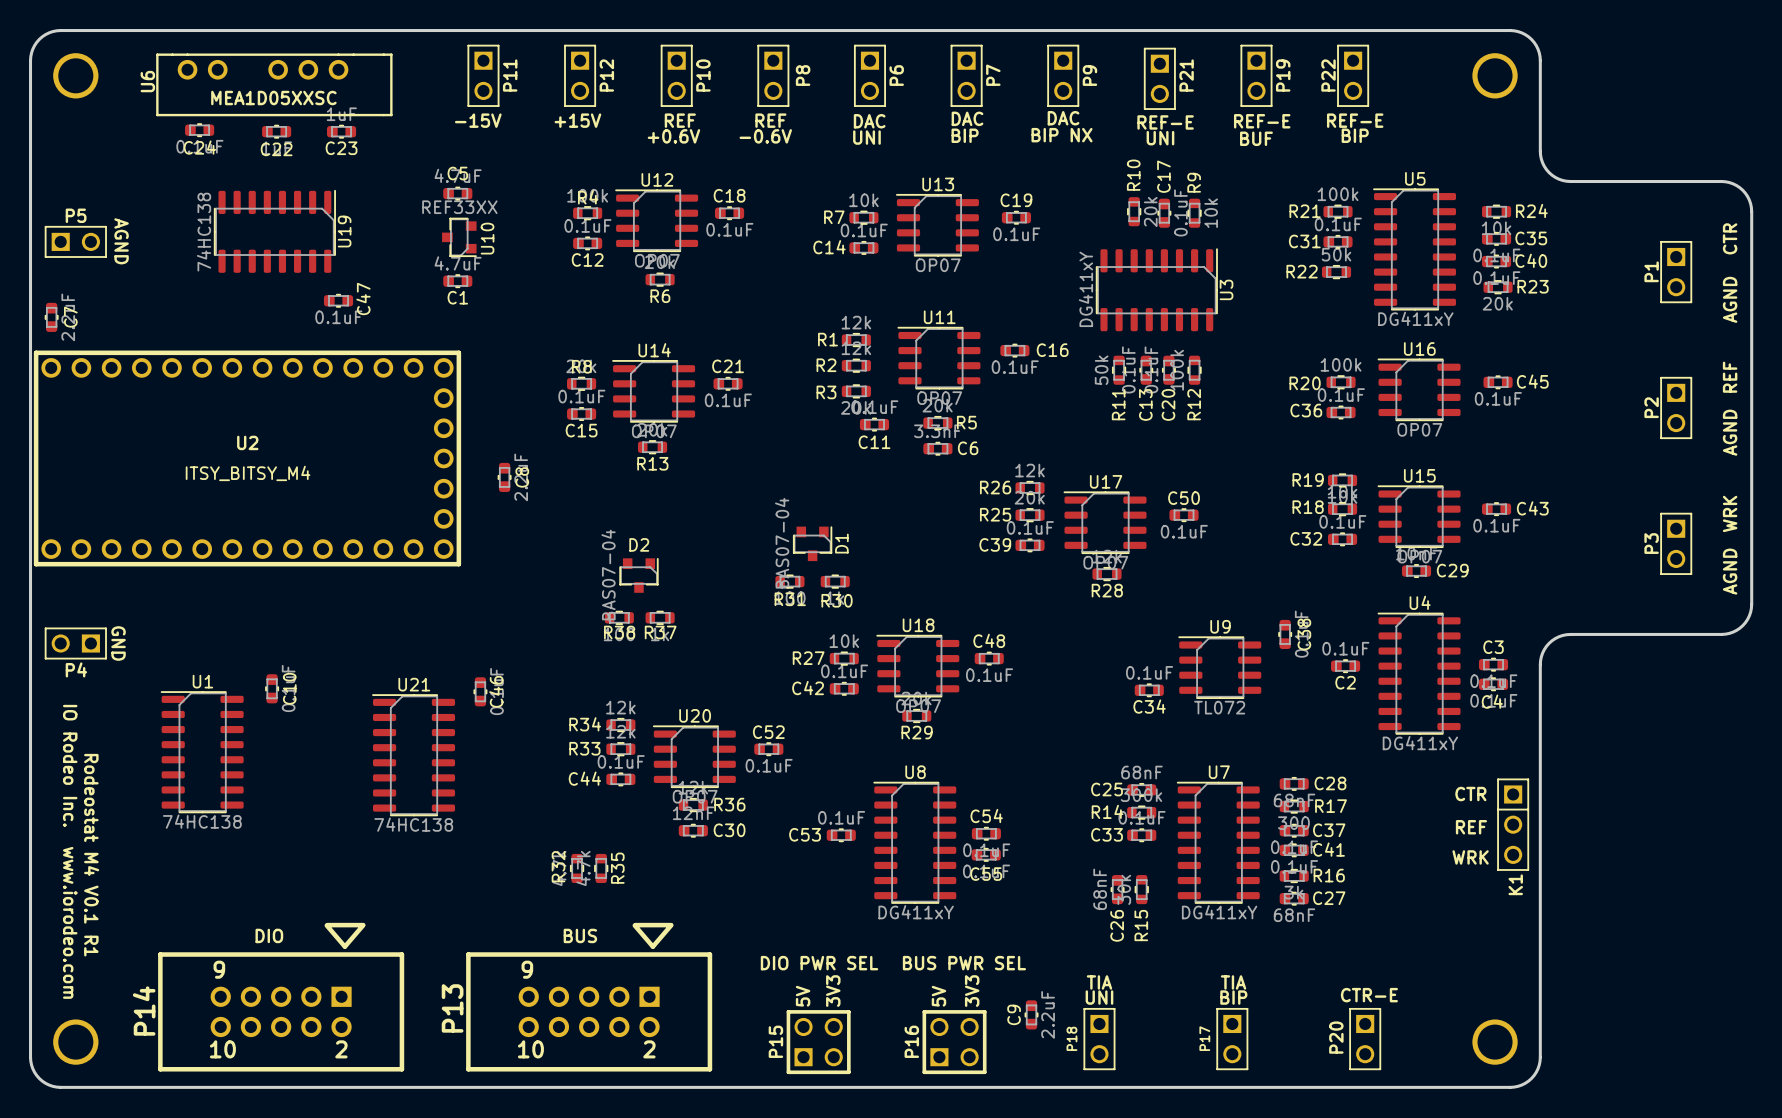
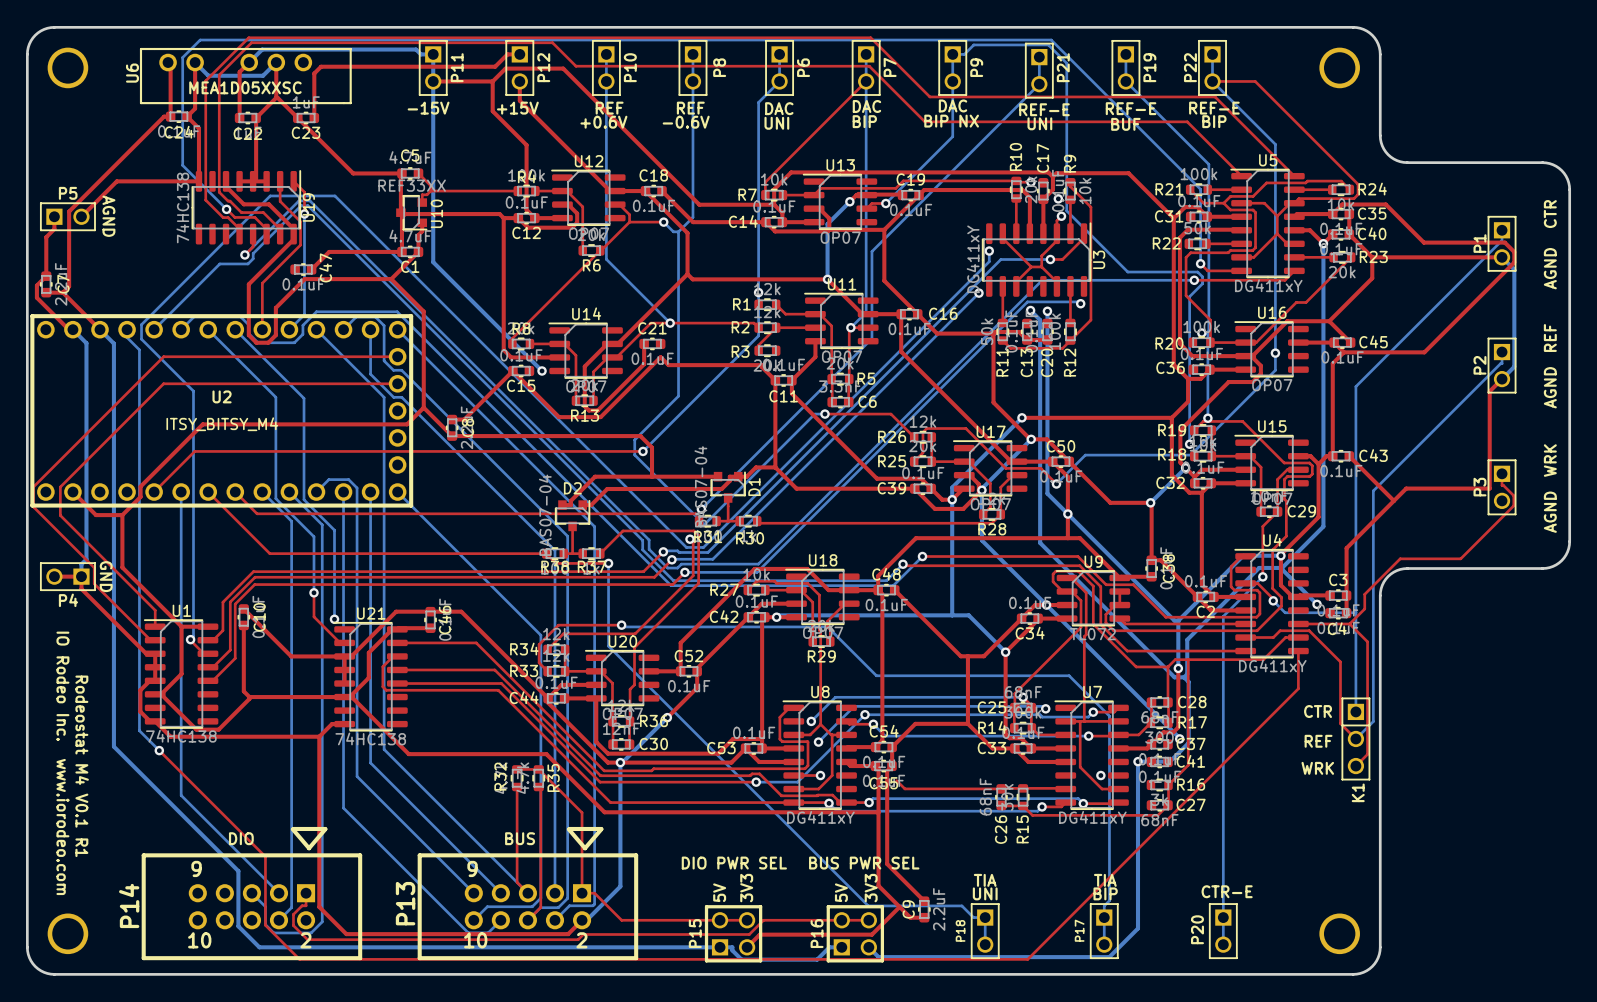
top track: none -> (519, 54) (507, 54) (495, 66) (321, 66) (314, 73) (314, 117)
bottom track: none -> (606, 54) (606, 259) (670, 323)
bottom track: none -> (692, 54) (692, 217) (678, 231)
bottom track: none -> (779, 54) (779, 81) (758, 102) (758, 335) (643, 451)
bottom track: none -> (866, 54) (866, 312) (850, 327)
bottom track: none -> (1125, 54) (1125, 81) (1208, 164) (1208, 331) (1207, 332)
bottom track: none -> (1212, 54) (1212, 81) (1275, 144) (1275, 370) (1190, 455) (1085, 455) (1056, 483)
bottom track: none -> (1039, 57) (1039, 84) (871, 251) (871, 338) (701, 509)
top track: none -> (168, 62) (170, 65) (170, 116) (164, 116) (69, 211) (69, 286) (62, 292)
top track: none -> (195, 62) (195, 108) (187, 116) (198, 128) (198, 181) (116, 181) (81, 216)
bottom track: none -> (195, 62) (208, 75) (263, 75) (276, 62)
top track: none -> (249, 62) (239, 72) (239, 117)
bottom track: none -> (249, 62) (262, 49) (416, 49) (420, 54) (433, 54) (433, 262) (542, 370)
top track: none -> (276, 62) (276, 97)
top track: none -> (433, 81) (492, 81)
top track: none -> (492, 81) (505, 68) (563, 68) (699, 204) (774, 204)
top track: none -> (492, 81) (492, 111) (526, 145) (526, 209) (534, 218) (562, 218)
top track: none -> (519, 81) (519, 100) (610, 191) (645, 191) (687, 233) (687, 274)
top track: none -> (866, 81) (765, 182) (765, 195)
top track: none -> (1212, 81) (1255, 81) (1358, 184) (1358, 194) (1354, 198) (1298, 198) (1294, 203) (1290, 203) (1277, 216)
top track: none -> (276, 97) (256, 117) (256, 178) (253, 181)
top track: none -> (276, 97) (353, 173) (401, 173)
top track: none -> (400, 173) (401, 251) (329, 251) (311, 269)
top track: none -> (418, 173) (430, 185) (430, 191)
top track: none -> (1241, 176) (1187, 121) (924, 121) (869, 66) (576, 66) (552, 42) (251, 42) (219, 75) (219, 192) (241, 212) (263, 212) (280, 229) (280, 234)
top track: none -> (1294, 176) (1215, 96) (929, 96) (870, 37) (248, 37) (205, 80) (205, 200) (223, 217) (228, 217) (239, 229) (239, 234)
top track: none -> (1052, 176) (1052, 189) (1043, 199) (1043, 233)
top track: none -> (1052, 176) (1056, 173) (1128, 173) (1173, 218)
top track: none -> (1052, 176) (1048, 172) (791, 172) (774, 189) (774, 204)
top track: none -> (226, 181) (226, 186) (243, 204) (268, 204) (293, 229) (293, 239) (248, 284) (248, 335) (256, 342) (268, 342) (275, 335) (275, 307) (304, 279) (391, 279)
top track: none -> (239, 181) (266, 181)
top track: none -> (280, 181) (280, 201) (300, 221) (300, 245) (262, 283) (262, 329)
top track: none -> (293, 181) (304, 192) (304, 213)
top track: none -> (1030, 182) (903, 180) (895, 188) (820, 188) (814, 195) (782, 195)
via: none -> (1030, 182)
top track: none -> (1070, 182) (1070, 186) (1090, 207) (1090, 320) (1062, 348) (1010, 348) (1002, 340)
top track: none -> (1190, 189) (1203, 203) (1223, 203)
top track: none -> (1207, 189) (1241, 189)
top track: none -> (1294, 189) (1332, 189)
top track: none -> (1349, 189) (1341, 181) (1266, 182) (1253, 196) (1230, 196) (1223, 203)
top track: none -> (430, 191) (427, 194) (422, 194) (422, 202)
top track: none -> (430, 191) (517, 191)
top track: none -> (535, 191) (566, 191) (582, 206) (582, 250)
top track: none -> (662, 191) (693, 222) (765, 222) (775, 231) (827, 231) (829, 229)
top track: none -> (902, 195) (856, 195) (849, 201)
top track: none -> (1016, 198) (1016, 233)
via: none -> (1058, 198)
top track: none -> (1070, 199) (1070, 233)
bottom track: none -> (849, 201) (827, 224) (827, 279)
via: none -> (849, 201)
top track: none -> (1223, 203) (1230, 209) (1253, 209) (1255, 212) (1255, 247) (1252, 250) (1230, 250) (1228, 252) (1190, 252) (1186, 257) (1186, 295) (1210, 320) (1210, 342) (1256, 342) (1296, 302) (1306, 302) (1351, 257)
top track: none -> (1241, 203) (1264, 203) (1277, 216)
top track: none -> (885, 203) (871, 203) (866, 208)
bottom track: none -> (885, 203) (952, 136) (952, 54) (964, 54) (973, 44) (1048, 44) (1066, 63) (1066, 210) (1127, 272) (1197, 272) (1202, 276) (1202, 283) (1189, 296) (1189, 444)
via: none -> (885, 203)
top track: none -> (562, 204) (568, 204) (577, 213) (577, 222) (572, 227) (527, 227) (518, 218) (503, 218)
top track: none -> (615, 204) (619, 204) (629, 214) (629, 222)
top track: none -> (774, 204) (782, 212) (782, 222) (814, 222)
top track: none -> (814, 208) (819, 208) (829, 218) (829, 229)
bottom track: none -> (226, 209) (182, 165) (182, 57) (200, 40) (1051, 40) (1200, 189) (1200, 263)
via: none -> (226, 209)
top track: none -> (226, 209) (234, 217) (254, 217) (266, 229) (266, 234)
bottom track: none -> (304, 213) (304, 314) (289, 329)
via: none -> (304, 213)
top track: none -> (401, 214) (499, 214) (503, 218)
top track: none -> (1349, 214) (1349, 234) (1372, 257)
top track: none -> (54, 216) (54, 229) (46, 237) (46, 276) (36, 285) (36, 297) (68, 329) (72, 329)
top track: none -> (1061, 216) (1056, 220) (1056, 240) (1041, 255) (1041, 266)
via: none -> (1061, 216)
top track: none -> (1241, 216) (1207, 216) (1197, 207) (1185, 207) (1173, 218)
top track: none -> (1277, 216) (1277, 233)
top track: none -> (1294, 216) (1297, 214) (1332, 214) (1342, 204) (1385, 204) (1423, 242) (1504, 242) (1514, 252) (1514, 262) (1424, 352) (1343, 352)
top track: none -> (503, 218) (503, 349) (511, 357) (559, 357)
top track: none -> (1173, 218) (1173, 364) (1188, 378)
top track: none -> (629, 222) (663, 222)
top track: none -> (629, 222) (512, 338) (512, 343)
bottom track: none -> (663, 222) (673, 231) (678, 231)
via: none -> (663, 222)
top track: none -> (422, 222) (422, 231) (418, 235) (418, 251) (391, 279)
top track: none -> (829, 229) (884, 229)
top track: none -> (884, 229) (884, 280) (937, 333) (993, 333)
top track: none -> (884, 229) (924, 190) (1022, 190) (1029, 197) (1029, 233)
top track: none -> (1241, 230) (1188, 229) (1180, 237) (1180, 343) (1193, 357) (1251, 356) (1260, 365) (1260, 373) (1252, 382) (1228, 382) (1180, 430) (1180, 462) (1194, 476)
top track: none -> (1294, 230) (1310, 230) (1323, 243) (1332, 234)
bottom track: none -> (1502, 230) (1502, 241) (1355, 386) (1355, 711)
bottom track: none -> (678, 231) (678, 396) (634, 439) (634, 455) (704, 524) (814, 414) (824, 414)
top track: none -> (1002, 233) (1002, 238) (1031, 266)
top track: none -> (1083, 233) (1083, 238) (1062, 259) (1050, 259)
top track: none -> (253, 234) (253, 246) (244, 254)
top track: none -> (1277, 233) (1287, 243) (1294, 243)
top track: none -> (1277, 233) (1253, 257) (1241, 257)
bottom track: none -> (1323, 243) (1323, 526) (1282, 567)
via: none -> (1323, 243)
top track: none -> (1206, 243) (1241, 243)
bottom track: none -> (989, 251) (989, 261) (703, 547) (686, 547) (334, 195) (270, 195) (141, 324) (141, 339) (193, 391) (193, 636) (190, 639)
via: none -> (989, 251)
bottom track: none -> (244, 254) (299, 200) (309, 200) (649, 540) (649, 549) (667, 568) (677, 568) (681, 564) (758, 564) (1042, 280) (1194, 280)
via: none -> (244, 254)
top track: none -> (1294, 257) (1333, 257)
top track: none -> (1372, 257) (1372, 278) (1329, 321)
top track: none -> (1372, 257) (1502, 257)
bottom track: none -> (1502, 257) (1514, 269) (1514, 366) (1502, 379)
bottom track: none -> (1050, 259) (1000, 259) (707, 552) (663, 551)
via: none -> (1050, 259)
top track: none -> (1200, 263) (1207, 270) (1241, 270)
via: none -> (1200, 263)
top track: none -> (1031, 266) (1016, 281) (1016, 286)
top track: none -> (1031, 266) (1041, 266)
top track: none -> (1041, 266) (1056, 282) (1056, 286)
top track: none -> (1294, 270) (1284, 280) (1194, 280)
top track: none -> (687, 274) (692, 279) (827, 279) (862, 314) (901, 314) (901, 351) (1011, 461) (1052, 461) (1067, 476) (1067, 538)
top track: none -> (687, 274) (617, 343) (607, 343) (584, 366) (584, 406) (588, 410) (597, 410) (644, 364) (644, 343)
top track: none -> (391, 279) (423, 311) (423, 407)
via: none -> (827, 279)
via: none -> (1194, 280)
top track: none -> (1002, 286) (1002, 322)
top track: none -> (1070, 286) (1070, 322)
top track: none -> (46, 292) (62, 292)
top track: none -> (62, 292) (100, 329)
via: none -> (758, 292)
bottom track: none -> (978, 293) (712, 559) (671, 559)
via: none -> (978, 293)
bottom track: none -> (1080, 303) (1078, 301) (1027, 301) (757, 572) (684, 572)
via: none -> (1080, 303)
top track: none -> (776, 304) (785, 314) (819, 314) (831, 326) (832, 402)
bottom track: none -> (1030, 310) (1040, 320) (1040, 542) (1174, 677) (1184, 677)
via: none -> (1030, 310)
bottom track: none -> (1047, 311) (1047, 493) (1174, 620) (1178, 620)
via: none -> (1047, 311)
top track: none -> (1329, 321) (1287, 321) (1251, 356)
top track: none -> (1329, 321) (1350, 342)
via: none -> (670, 323)
top track: none -> (758, 327) (754, 323) (650, 323) (616, 357) (607, 357) (593, 371) (593, 400)
top track: none -> (815, 327) (776, 327) (758, 345) (758, 350)
via: none -> (850, 327)
top track: none -> (868, 327) (849, 329) (848, 402)
bottom track: none -> (72, 329) (86, 343) (86, 559) (81, 564) (81, 576)
bottom track: none -> (100, 329) (113, 343) (113, 746) (238, 871) (238, 926) (259, 947) (732, 947) (732, 950) (741, 959) (817, 959) (829, 947) (841, 947)
bottom track: none -> (127, 329) (127, 337) (139, 349) (139, 730) (159, 750)
bottom track: none -> (154, 329) (219, 263) (248, 263) (253, 258) (253, 253) (301, 205) (307, 205) (642, 540) (642, 549) (673, 580) (886, 580) (902, 564)
bottom track: none -> (181, 329) (193, 316) (240, 316) (248, 324) (248, 333) (257, 342) (294, 342) (302, 334) (302, 325) (316, 311) (397, 311) (671, 585) (893, 585) (922, 556)
bottom track: none -> (208, 329) (275, 397) (275, 498) (314, 536) (314, 592)
bottom track: none -> (235, 329) (304, 398) (304, 499) (334, 530) (334, 619)
bottom track: none -> (316, 329) (384, 397) (384, 749) (527, 893)
bottom track: none -> (343, 329) (356, 316) (375, 316) (384, 325) (384, 360) (393, 370) (401, 370) (567, 536) (567, 898) (558, 907) (540, 907) (527, 920)
bottom track: none -> (370, 329) (370, 374) (393, 397) (401, 397) (554, 550) (554, 893)
bottom track: none -> (397, 329) (594, 526) (594, 904) (569, 905) (554, 920)
via: none -> (1201, 333)
bottom track: none -> (1207, 332) (1207, 418)
top track: none -> (993, 333) (1019, 331) (1027, 340) (1047, 340)
top track: none -> (993, 333) (993, 402) (1030, 439) (1046, 439) (1110, 502) (1150, 502) (1151, 560) (1160, 560) (1211, 610) (1245, 610)
top track: none -> (815, 341) (815, 356) (791, 380) (791, 393) (877, 478) (921, 478) (942, 499) (952, 499) (964, 488)
top track: none -> (1298, 342) (1334, 342) (1343, 352)
top track: none -> (529, 343) (564, 343) (575, 355) (575, 400)
bottom track: none -> (1502, 352) (1502, 363) (1373, 490) (1373, 721) (1355, 738)
top track: none -> (1343, 352) (1332, 363) (1332, 456) (1326, 456) (1318, 464)
via: none -> (1275, 353)
top track: none -> (397, 356) (163, 356) (33, 486) (33, 507) (94, 567) (94, 583) (150, 640) (155, 640)
top track: none -> (1245, 369) (1209, 369) (1200, 378) (1188, 378)
via: none -> (542, 370)
top track: none -> (1188, 378) (1188, 401) (1171, 417)
top track: none -> (1502, 379) (1489, 391) (1489, 488) (1406, 488) (1346, 548) (1346, 613)
top track: none -> (397, 383) (163, 383) (60, 487) (60, 515) (155, 610) (155, 626)
top track: none -> (423, 407) (407, 424) (202, 424) (140, 486) (140, 496) (122, 515)
top track: none -> (423, 407) (452, 436) (640, 436) (652, 447) (652, 476)
top track: none -> (824, 414) (890, 414) (914, 437)
via: none -> (824, 414)
top track: none -> (1021, 417) (1171, 417)
bottom track: none -> (1021, 417) (952, 487) (952, 615)
via: none -> (1021, 417)
top track: none -> (1171, 417) (1171, 475) (1189, 492) (1201, 492)
via: none -> (1207, 418)
top track: none -> (452, 419) (464, 419) (512, 370) (559, 417) (600, 417) (660, 357) (668, 365) (761, 365) (775, 380) (775, 467)
top track: none -> (1194, 430) (1203, 421) (1242, 421) (1284, 462) (1309, 462) (1312, 465) (1312, 474) (1309, 476) (1287, 476) (1284, 479) (1286, 536) (1272, 549) (1272, 588) (1281, 597) (1281, 606) (1257, 630) (1113, 630) (1105, 622) (1105, 614) (1115, 605) (1119, 605) (1119, 591)
top track: none -> (1211, 430) (1211, 456) (1250, 456) (1261, 467) (1261, 511)
top track: none -> (931, 437) (931, 461) (968, 461) (990, 483) (990, 507) (983, 514)
bottom track: none -> (1031, 439) (981, 488) (981, 540) (1179, 738)
via: none -> (1031, 439)
via: none -> (1189, 444)
top track: none -> (643, 451) (194, 451) (154, 492)
via: none -> (643, 451)
top track: none -> (1298, 456) (1310, 456) (1318, 464)
top track: none -> (1349, 456) (1393, 500)
top track: none -> (914, 461) (922, 452) (922, 432) (926, 428) (965, 428) (1005, 468) (1040, 468) (1056, 483)
top track: none -> (1318, 464) (1318, 517) (1280, 554) (1280, 585) (1292, 596) (1330, 595)
top track: none -> (775, 467) (796, 488) (914, 488) (934, 508) (963, 508) (978, 493) (978, 484) (969, 475) (964, 475)
top track: none -> (775, 467) (755, 467) (746, 476) (729, 476) (729, 480) (721, 489) (607, 489) (591, 505) (582, 505)
bottom track: none -> (1185, 467) (1150, 502)
via: none -> (1185, 467)
top track: none -> (1245, 469) (1201, 469) (1194, 476)
top track: none -> (1298, 469) (1287, 469) (1277, 479) (1277, 511) (1262, 526) (1262, 576)
top track: none -> (1502, 473) (1502, 485) (1513, 495) (1513, 505) (1460, 558) (1400, 558) (1364, 594) (1364, 608) (1349, 623)
top track: none -> (1016, 475) (1012, 475) (1000, 487) (1000, 514) (991, 523) (759, 523) (757, 521)
top track: none -> (718, 476) (595, 476) (570, 500) (570, 505) (562, 505)
top track: none -> (1245, 483) (1211, 483) (1201, 492)
via: none -> (1056, 483)
via: none -> (981, 490)
top track: none -> (72, 492) (96, 515) (122, 515)
bottom track: none -> (181, 492) (181, 795) (278, 893)
top track: none -> (208, 492) (269, 553) (546, 553) (555, 563) (608, 563)
top track: none -> (235, 492) (257, 513) (696, 514)
bottom track: none -> (262, 492) (291, 521) (291, 907) (278, 920)
bottom track: none -> (289, 492) (322, 524) (322, 921) (311, 932) (273, 932) (265, 924) (265, 906) (251, 893)
bottom track: none -> (316, 492) (328, 479) (348, 479) (357, 487) (357, 776) (473, 893)
bottom track: none -> (343, 492) (343, 808) (468, 932) (488, 932) (500, 920)
bottom track: none -> (370, 492) (370, 762) (500, 893)
bottom track: none -> (397, 492) (540, 635) (540, 898) (532, 906) (487, 906) (473, 920)
top track: none -> (1201, 492) (1201, 584) (1214, 596) (1245, 596)
top track: none -> (728, 497) (728, 521)
via: none -> (952, 499)
via: none -> (1150, 502)
via: none -> (701, 509)
via: none -> (1067, 514)
top track: none -> (122, 515) (122, 567) (181, 626)
top track: none -> (716, 521) (739, 521)
top track: none -> (572, 526) (572, 553)
top track: none -> (689, 539) (693, 542) (693, 575) (635, 633) (563, 633) (547, 649)
via: none -> (689, 539)
top track: none -> (663, 551) (643, 571) (253, 571) (222, 602) (222, 630) (213, 640) (207, 640)
via: none -> (663, 551)
top track: none -> (563, 553) (582, 553)
top track: none -> (600, 553) (623, 530) (693, 530) (698, 535) (698, 583) (634, 647) (634, 684) (630, 689) (629, 744)
top track: none -> (1245, 556) (1241, 556) (1231, 566) (1231, 586) (1234, 590) (1257, 590) (1259, 592) (1259, 613) (1256, 617) (1165, 617) (1133, 584) (1106, 584) (1077, 556) (922, 556)
bottom track: none -> (1280, 555) (1243, 555) (1178, 620)
via: none -> (1280, 555)
via: none -> (922, 556)
top track: none -> (671, 559) (654, 577) (255, 577) (230, 602) (230, 650) (213, 667) (207, 667)
via: none -> (671, 559)
bottom track: none -> (608, 563) (608, 646) (868, 905) (961, 905) (973, 917) (985, 917) (985, 944)
via: none -> (608, 563)
top track: none -> (902, 564) (904, 565) (1079, 565) (1100, 586) (1100, 624) (1127, 651) (1245, 651)
via: none -> (902, 564)
bottom track: none -> (1282, 567) (1259, 567) (1187, 639) (1187, 674) (1184, 677)
bottom track: none -> (1282, 567) (1317, 604)
top track: none -> (684, 572) (672, 584) (254, 584) (235, 604) (235, 658) (212, 680) (207, 680)
via: none -> (684, 572)
top track: none -> (54, 576) (81, 576) (81, 588) (146, 653) (155, 653) (155, 680) (149, 680) (140, 690) (140, 711) (150, 721) (155, 721) (170, 736) (319, 736)
top track: none -> (1151, 576) (1119, 577) (1080, 538) (915, 538) (878, 575) (878, 590)
bottom track: none -> (1262, 576) (1223, 616) (1223, 944)
via: none -> (1262, 576)
top track: none -> (1067, 577) (1071, 577) (1086, 592) (1084, 721)
top track: none -> (1245, 583) (1257, 583) (1273, 600)
top track: none -> (747, 590) (756, 581) (807, 583) (819, 595) (820, 724)
top track: none -> (765, 590) (800, 590) (812, 602) (812, 641)
top track: none -> (878, 590) (882, 594) (882, 740) (875, 747) (846, 748)
top track: none -> (878, 590) (828, 590) (807, 568) (754, 568) (680, 642) (680, 671) (649, 671)
top track: none -> (894, 590) (960, 656) (983, 656) (1035, 605) (1067, 605)
top track: none -> (314, 592) (314, 616) (340, 642) (344, 642)
via: none -> (314, 592)
bottom track: none -> (1273, 600) (1285, 612) (1355, 612)
via: none -> (1273, 600)
top track: none -> (796, 603) (761, 603) (697, 668) (697, 687) (667, 717)
top track: none -> (849, 603) (845, 603) (827, 621) (827, 626) (830, 629) (830, 641)
via: none -> (1317, 604)
via: none -> (1046, 605)
top track: none -> (243, 608) (291, 656) (351, 656) (396, 611) (461, 611) (548, 698)
bottom track: none -> (776, 617) (778, 615) (968, 615) (1005, 652)
via: none -> (776, 617)
top track: none -> (796, 617) (764, 617) (762, 619) (762, 748) (793, 748)
top track: none -> (1067, 618) (1038, 618) (1005, 652) (1005, 734) (1009, 738) (1021, 738) (1031, 748) (1065, 748)
top track: none -> (1119, 618) (1125, 623) (1245, 623)
via: none -> (334, 619)
bottom track: none -> (1178, 620) (1178, 668)
top track: none -> (1298, 623) (1349, 623)
top track: none -> (1349, 623) (1367, 641) (1367, 754) (1355, 766)
top track: none -> (621, 625) (558, 625) (539, 644) (539, 662) (547, 671)
bottom track: none -> (621, 625) (623, 626) (827, 626) (876, 675) (1069, 675) (1109, 716) (1109, 900) (1104, 905) (1104, 944)
via: none -> (621, 625)
top track: none -> (243, 625) (243, 691) (249, 697)
top track: none -> (181, 626) (181, 673) (161, 694)
top track: none -> (181, 626) (207, 626)
top track: none -> (430, 628) (392, 629) (368, 652) (368, 677) (349, 697) (249, 697)
top track: none -> (1245, 637) (1273, 637) (1280, 630) (1309, 630) (1340, 661) (1340, 723) (1355, 738)
top track: none -> (1298, 637) (1285, 637) (1263, 659) (1175, 659) (1168, 666)
top track: none -> (190, 639) (203, 653) (207, 653)
via: none -> (190, 639)
top track: none -> (397, 642) (476, 642) (604, 770) (651, 770) (653, 768) (805, 768) (808, 765) (808, 742) (782, 741) (779, 739) (779, 717) (789, 707) (793, 707)
top track: none -> (565, 649) (565, 671) (600, 671) (612, 683) (613, 744)
top track: none -> (1298, 651) (1298, 688) (1027, 959) (299, 959) (265, 925) (265, 856) (159, 750)
via: none -> (1005, 652)
top track: none -> (344, 656) (344, 683)
top track: none -> (397, 656) (393, 656) (382, 666) (382, 686) (386, 690) (498, 690) (610, 802) (829, 803)
top track: none -> (967, 656) (967, 723)
top track: none -> (1188, 659) (1188, 765) (1168, 784) (1168, 804) (1157, 815) (1032, 815) (1023, 805) (1001, 805)
top track: none -> (1168, 666) (1168, 722)
top track: none -> (1168, 666) (1136, 666) (1093, 624) (1093, 586) (1078, 571) (1055, 571) (1053, 574) (1053, 581) (1062, 591) (1071, 591) (1081, 600) (1081, 627) (1014, 693) (1014, 728)
top track: none -> (1178, 668) (1178, 727) (1173, 732) (1163, 732) (1147, 748) (1118, 748)
via: none -> (1178, 668)
top track: none -> (397, 669) (494, 669) (600, 775) (750, 775) (759, 773) (781, 795) (832, 795) (840, 802) (869, 802)
bottom track: none -> (1184, 677) (1188, 681) (1188, 742) (1170, 761) (1137, 761) (1137, 928) (1109, 957) (878, 957) (868, 947)
top track: none -> (397, 683) (501, 683) (600, 782) (756, 782)
top track: none -> (596, 684) (561, 684) (548, 698)
top track: none -> (161, 694) (196, 729) (218, 729) (249, 697)
top track: none -> (350, 696) (408, 754) (546, 754) (604, 812) (878, 812)
top track: none -> (1023, 697) (1031, 705) (1031, 727) (1038, 734) (1065, 734)
bottom track: none -> (1023, 697) (835, 697) (811, 721)
via: none -> (1023, 697)
top track: none -> (548, 698) (548, 702) (607, 762) (731, 762) (745, 748) (759, 761) (793, 761)
top track: none -> (564, 698) (596, 698) (596, 742) (607, 753) (718, 753) (732, 739) (762, 739)
top track: none -> (1151, 702) (1151, 722) (1138, 734) (1088, 736)
top track: none -> (1118, 707) (1114, 712) (1093, 712)
bottom track: none -> (1045, 708) (1043, 706) (854, 706) (818, 742)
via: none -> (1045, 708)
bottom track: none -> (1093, 712) (1088, 717) (1042, 717) (1039, 714) (865, 714) (797, 782) (756, 782)
via: none -> (1093, 712)
via: none -> (865, 714)
bottom track: none -> (667, 717) (620, 762) (620, 886) (586, 920) (582, 920)
via: none -> (667, 717)
via: none -> (811, 721)
top track: none -> (846, 721) (849, 724) (873, 724)
top track: none -> (1065, 721) (1118, 721)
top track: none -> (1080, 721) (1080, 767) (1102, 789) (1118, 789)
top track: none -> (967, 723) (992, 748) (1014, 748) (1028, 761) (1065, 761)
top track: none -> (967, 723) (915, 723) (892, 747) (892, 765) (887, 770) (887, 864) (924, 901)
top track: none -> (344, 724) (331, 724) (319, 736)
top track: none -> (820, 724) (831, 734) (846, 734)
top track: none -> (820, 724) (810, 734) (793, 734)
bottom track: none -> (873, 724) (885, 736) (1088, 736)
via: none -> (873, 724)
top track: none -> (832, 734) (832, 775) (818, 789) (793, 789)
via: none -> (1088, 736)
top track: none -> (319, 736) (319, 907) (346, 934) (568, 934) (582, 920)
via: none -> (1179, 738)
via: none -> (818, 742)
via: none -> (159, 750)
via: none -> (1137, 761)
top track: none -> (846, 761) (850, 766) (875, 766) (878, 769) (878, 885) (899, 906)
via: none -> (620, 762)
top track: none -> (517, 769) (538, 769) (582, 812) (582, 893) (594, 893) (621, 920) (747, 920)
top track: none -> (793, 775) (820, 775)
via: none -> (820, 775)
via: none -> (1100, 775)
top track: none -> (896, 780) (904, 788) (1065, 789)
via: none -> (756, 782)
top track: none -> (517, 787) (517, 882) (527, 893)
top track: none -> (538, 787) (540, 789) (540, 907) (527, 920)
bottom track: none -> (869, 802) (873, 798) (1078, 798) (1083, 803)
via: none -> (869, 802)
top track: none -> (1065, 802) (1061, 806) (1042, 806)
top track: none -> (1118, 802) (1083, 803)
bottom track: none -> (829, 803) (836, 811) (1037, 811) (1042, 806)
via: none -> (829, 803)
via: none -> (1083, 803)
via: none -> (1042, 806)
top track: none -> (306, 893) (306, 905) (302, 905) (293, 914) (293, 925) (307, 939) (578, 939) (583, 934) (749, 934) (763, 920) (868, 920)
top track: none -> (899, 906) (910, 917) (924, 917)
top track: none -> (899, 906) (871, 934) (759, 934) (747, 947)

